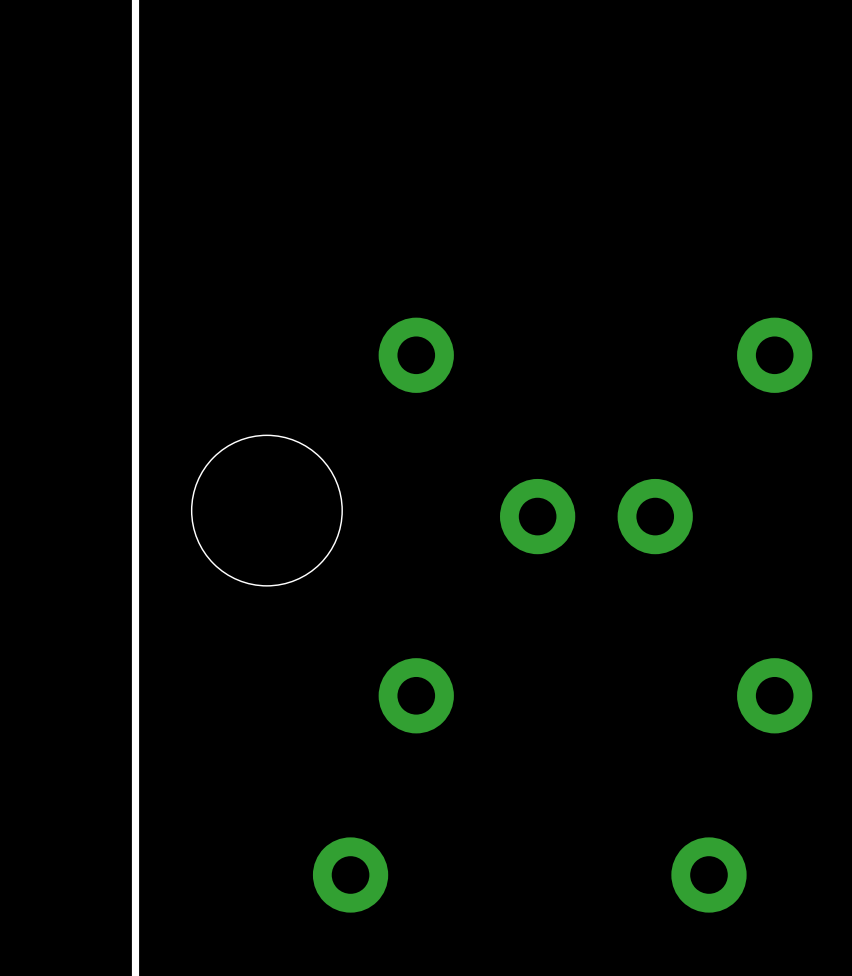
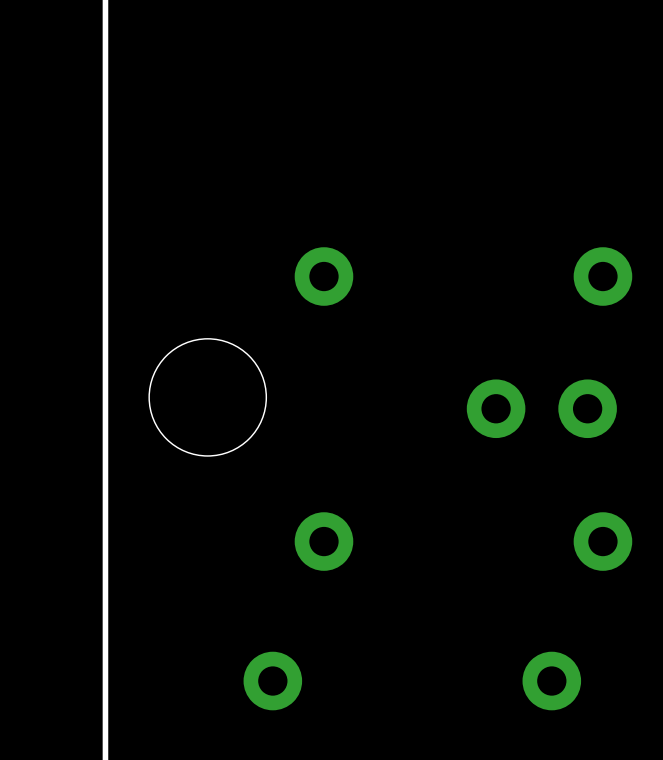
part position: (596, 516) -> (541, 408)

